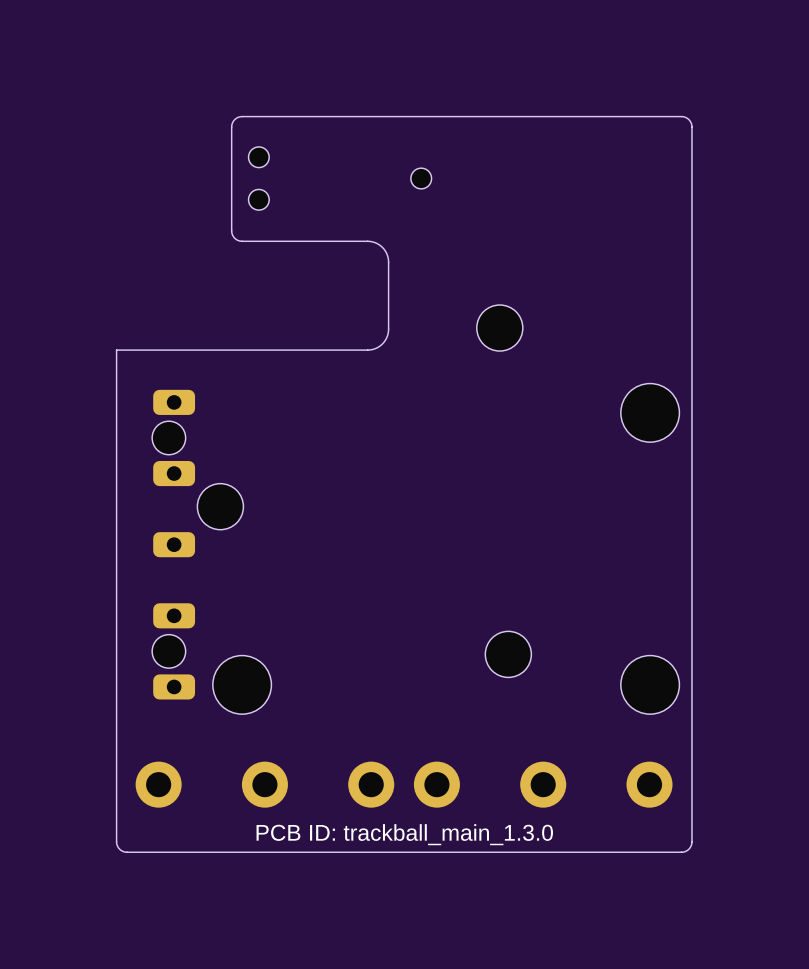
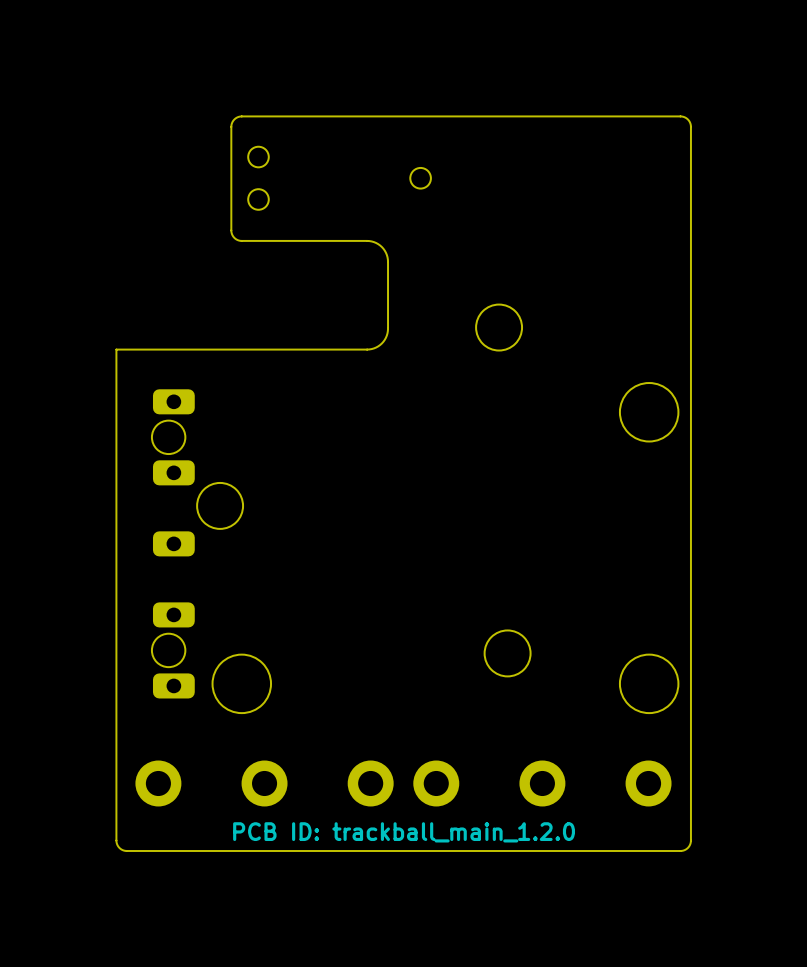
text: PCB ID: trackball_main_1.3.0 (404, 834) -> PCB ID: trackball_main_1.2.0 (404, 832)

